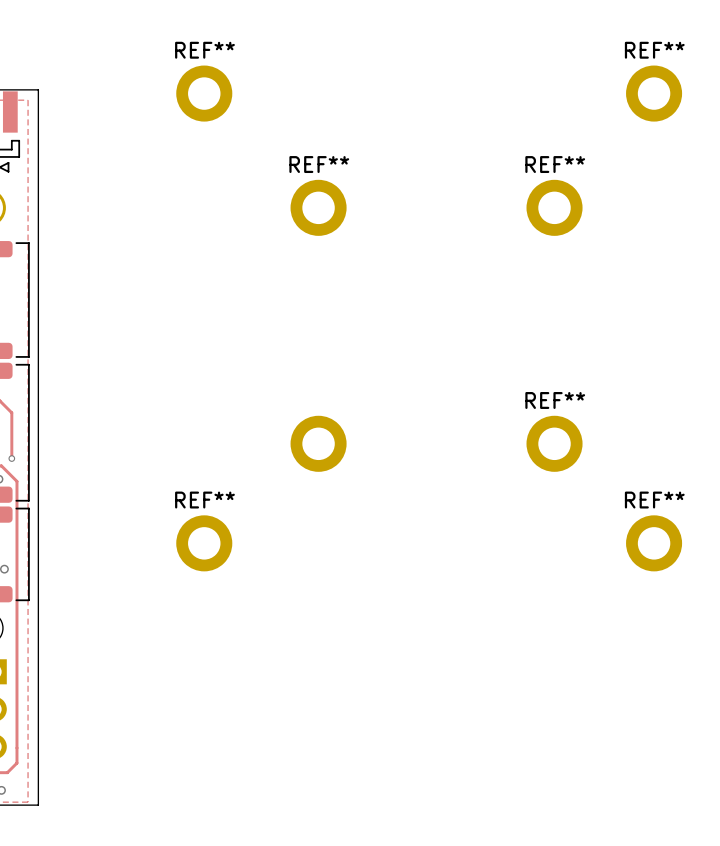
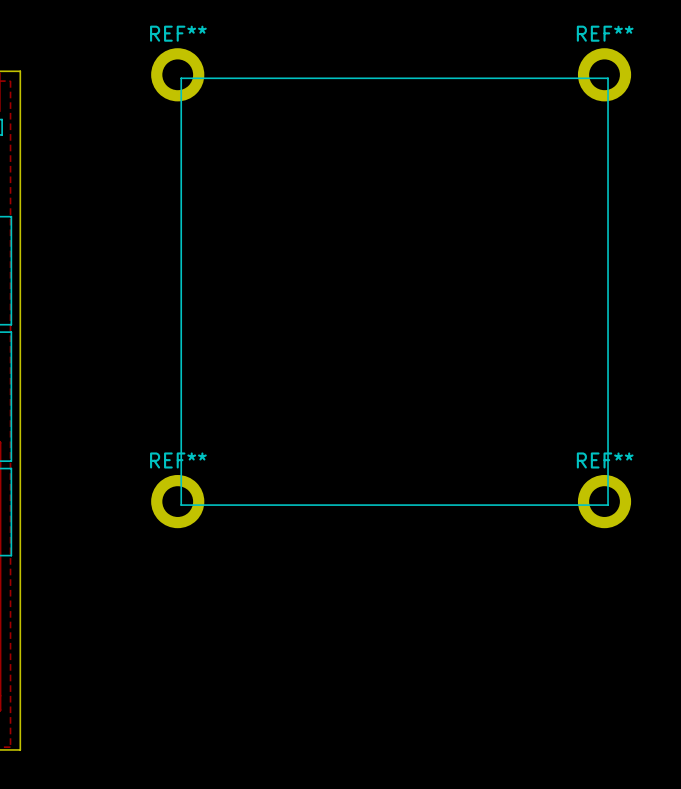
line: none -> (181, 78) (608, 78) (608, 505) (181, 505) (181, 78)
REF**: (318, 207) -> none
REF**: (554, 207) -> none
part: (318, 443) -> none
REF**: (554, 443) -> none

